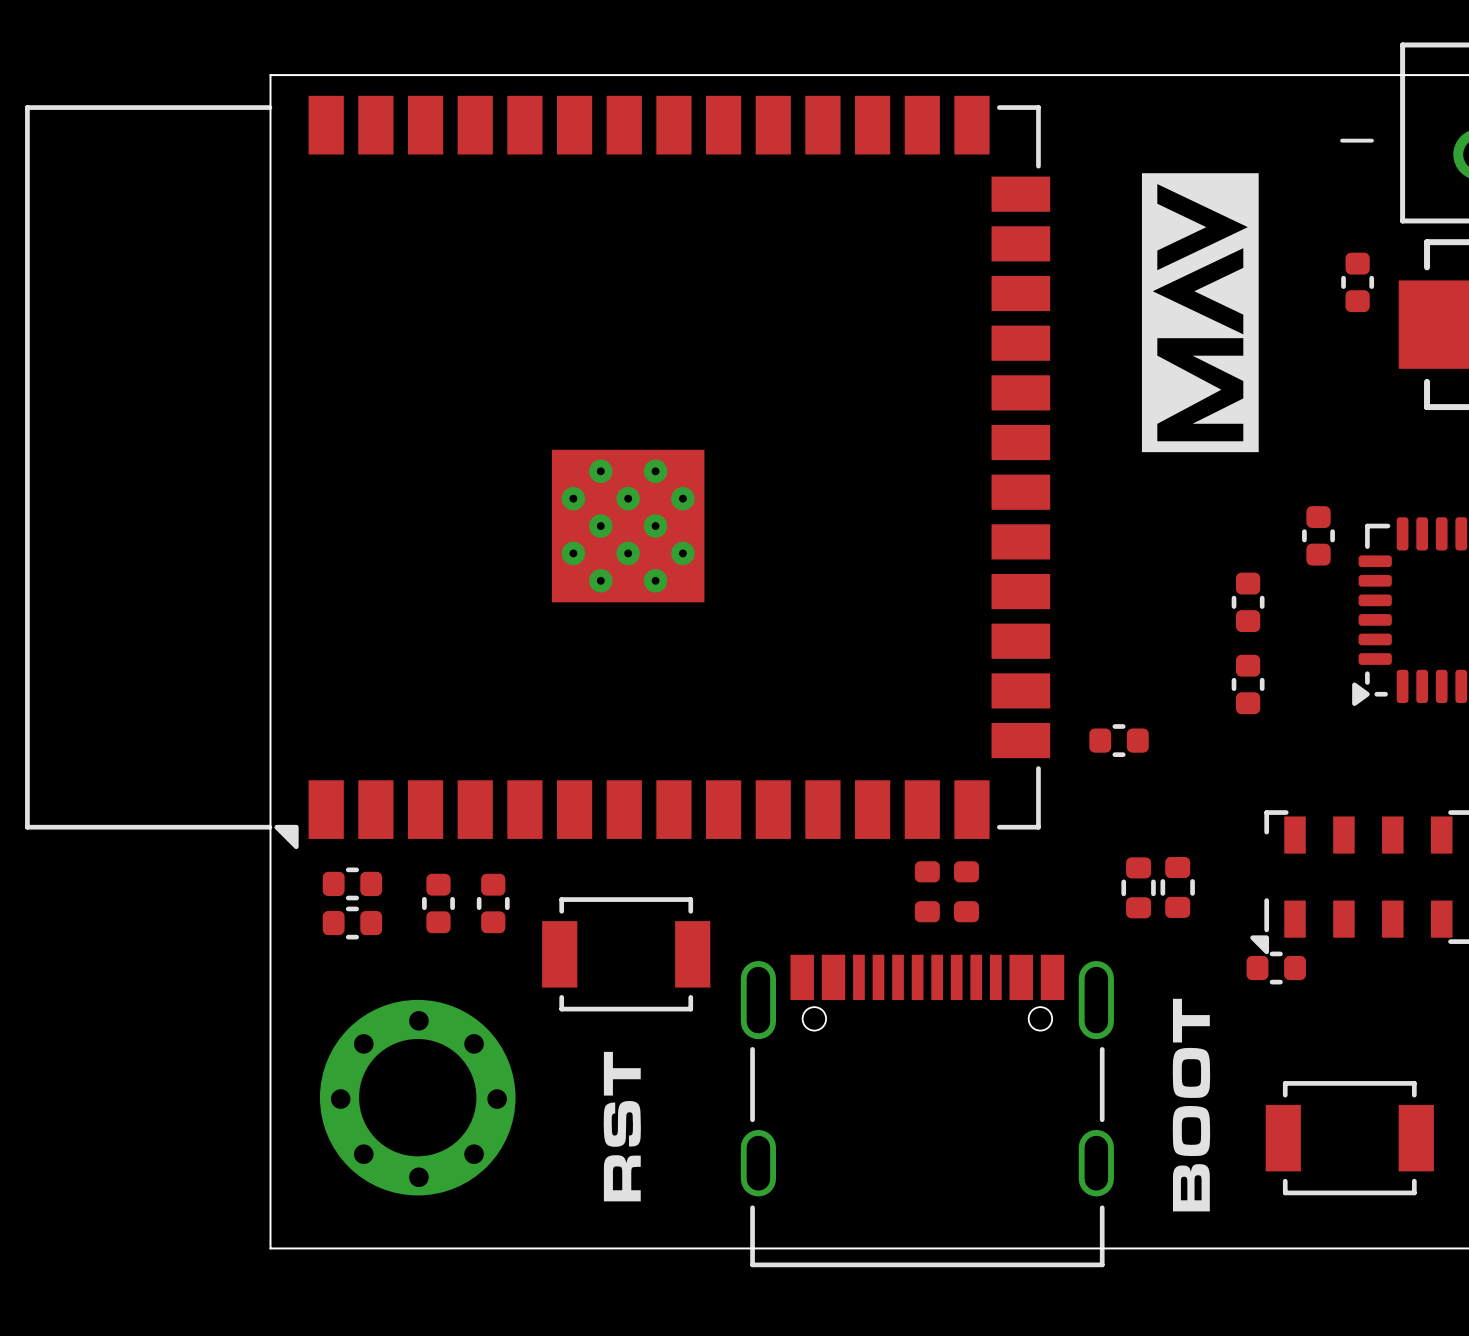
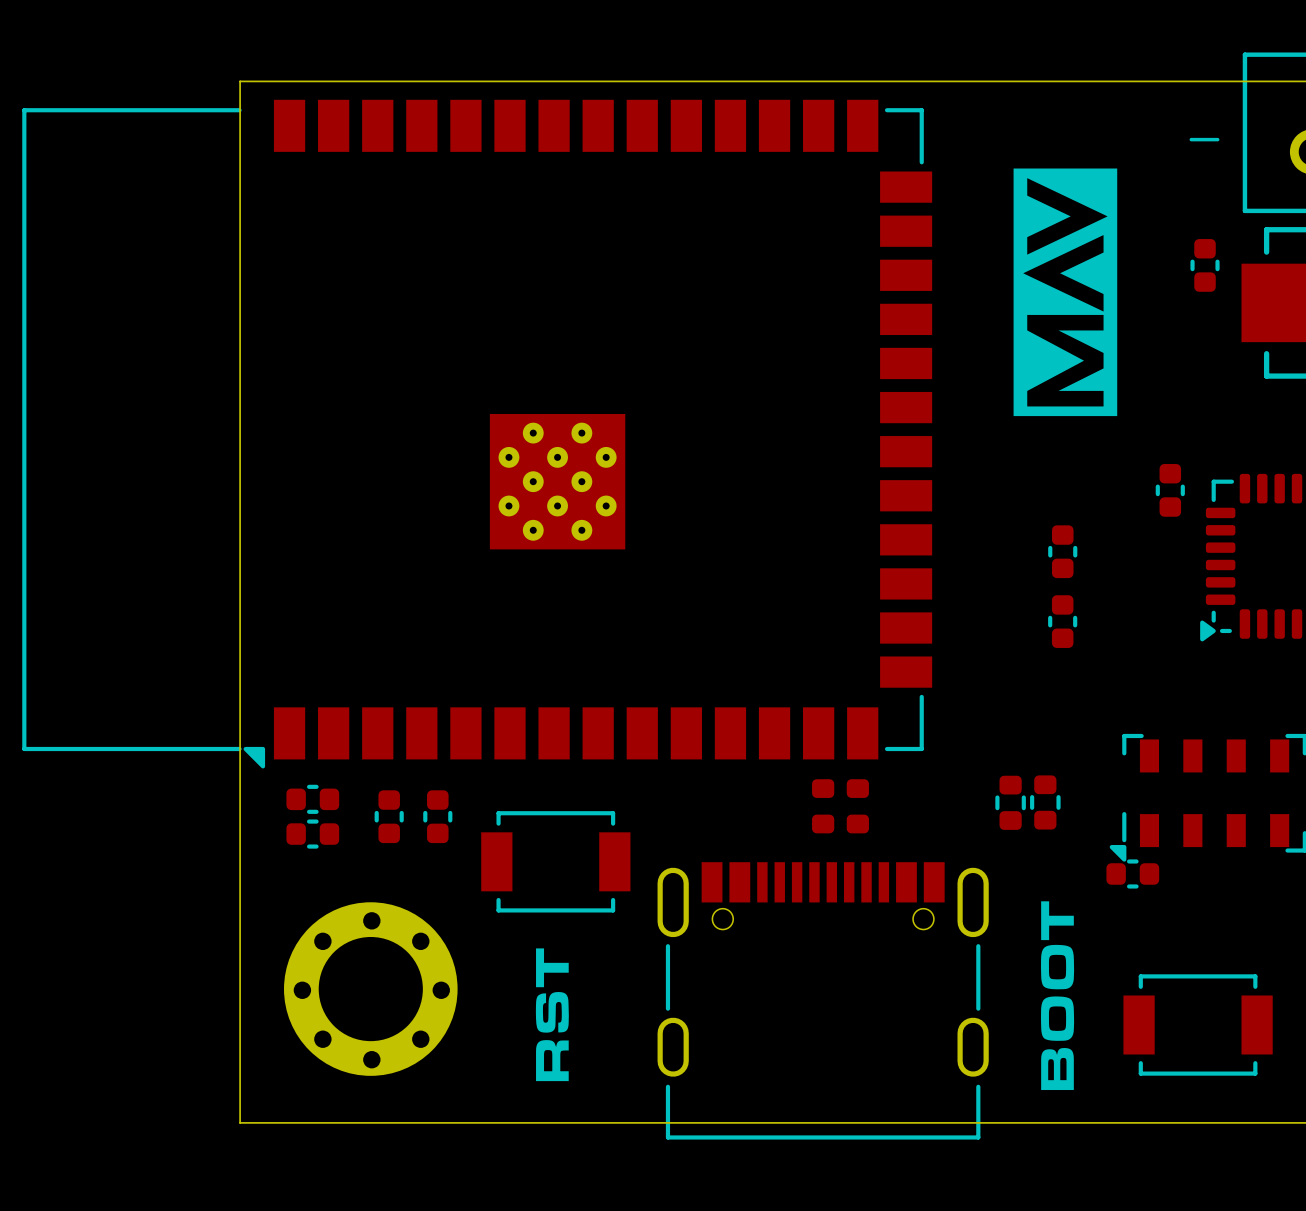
part: (1248, 602) -> none
part: none -> (1062, 551)
part: none -> (1062, 621)
part: (1248, 684) -> none
part: (1119, 740) -> none

